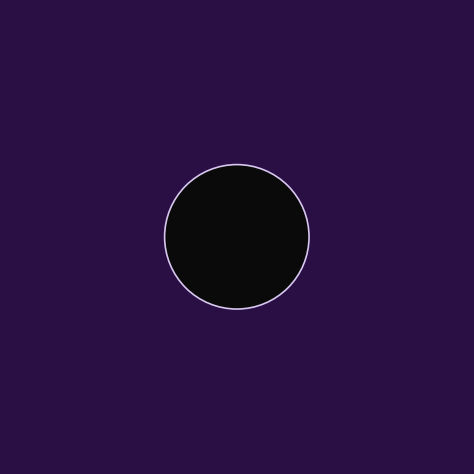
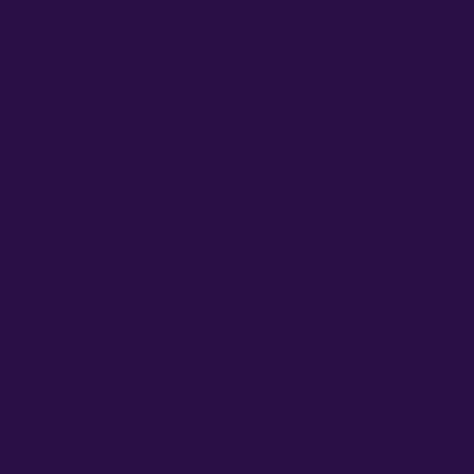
part: (236, 236) -> none

